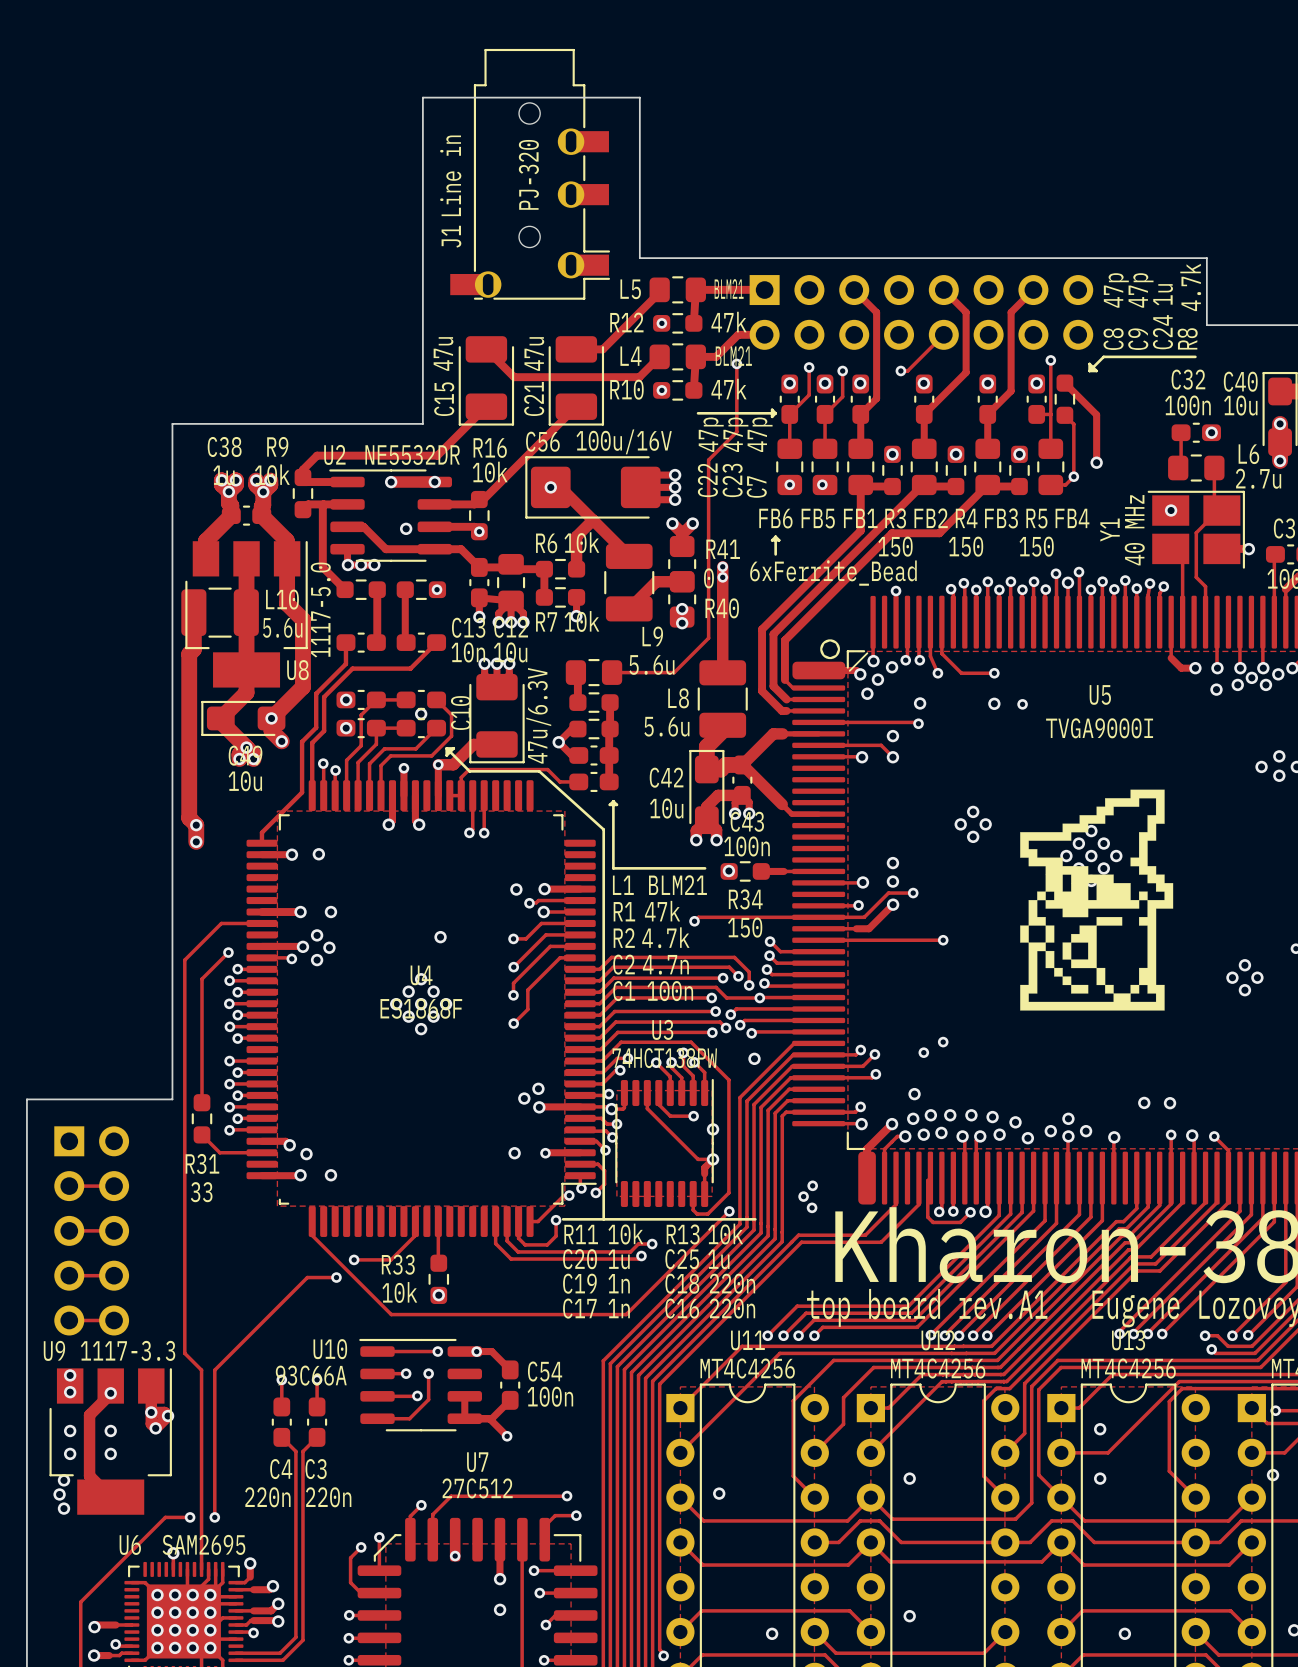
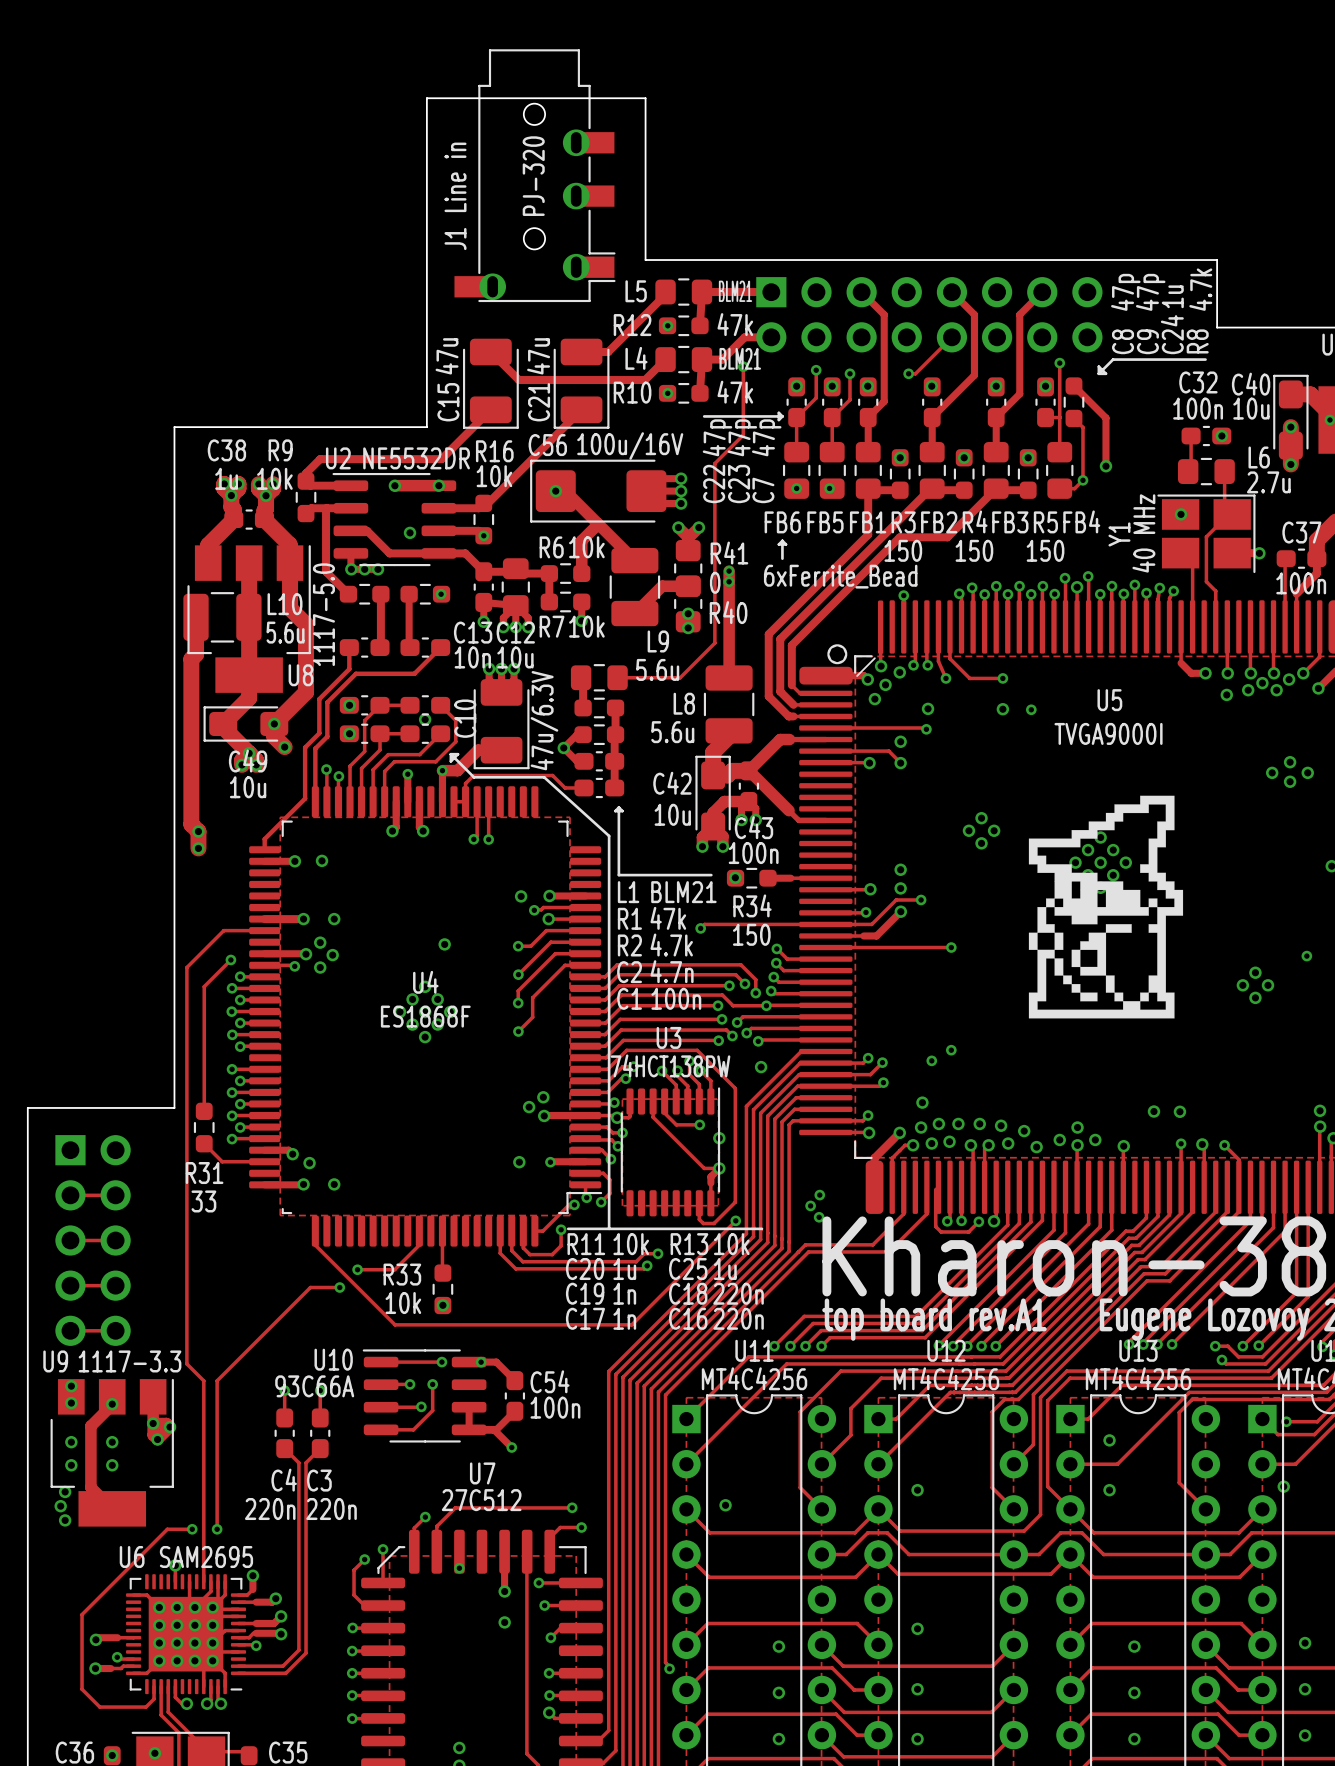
J1 footprint: [450, 48, 611, 300] -> [454, 49, 616, 303]

